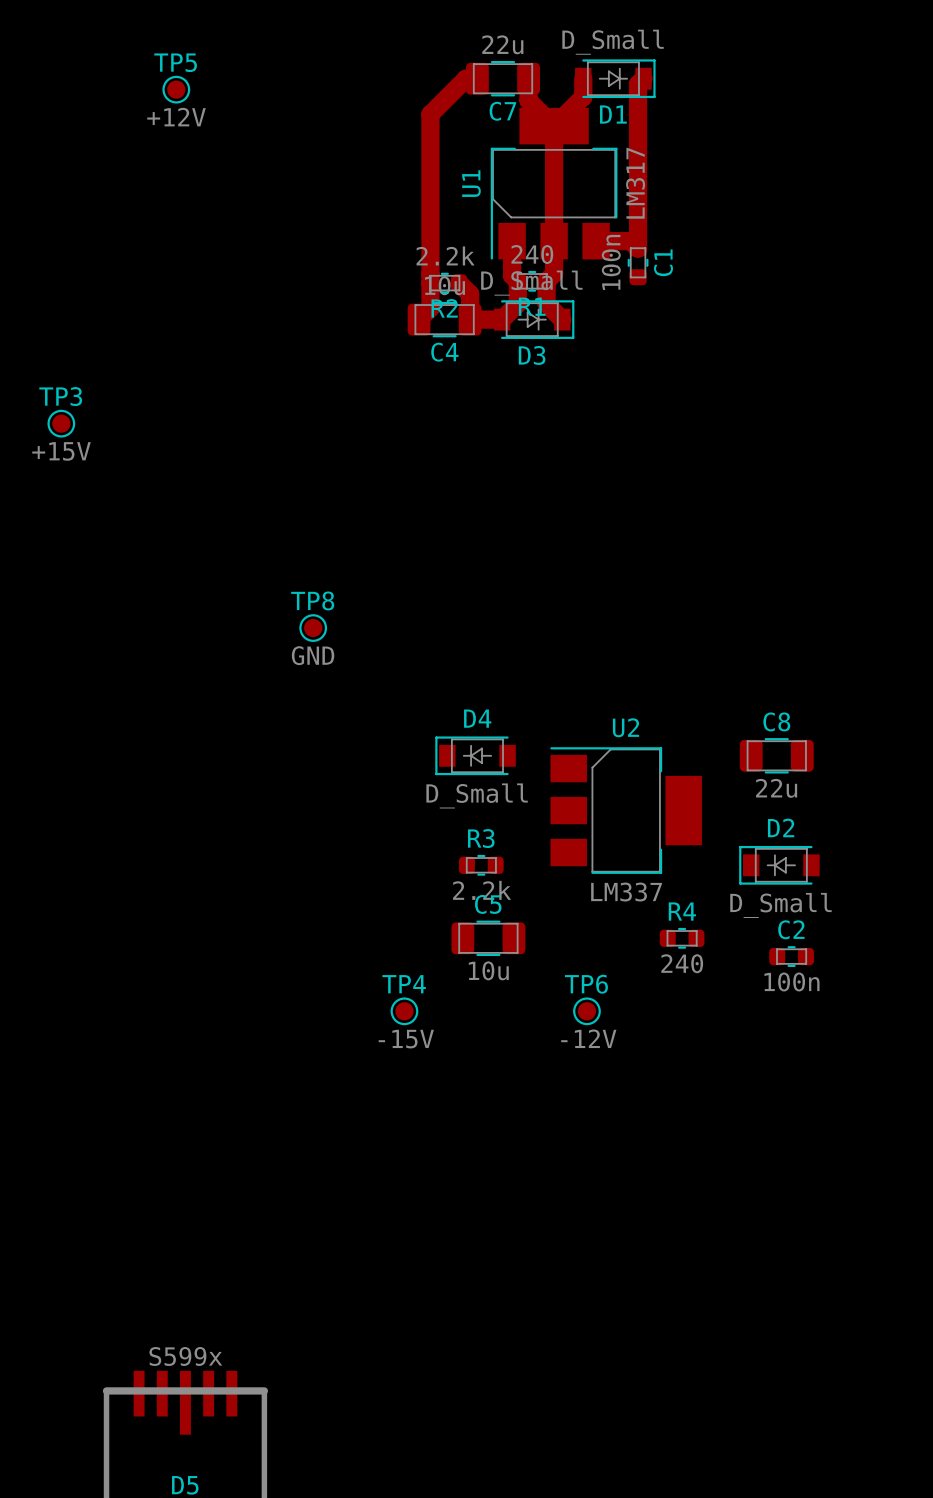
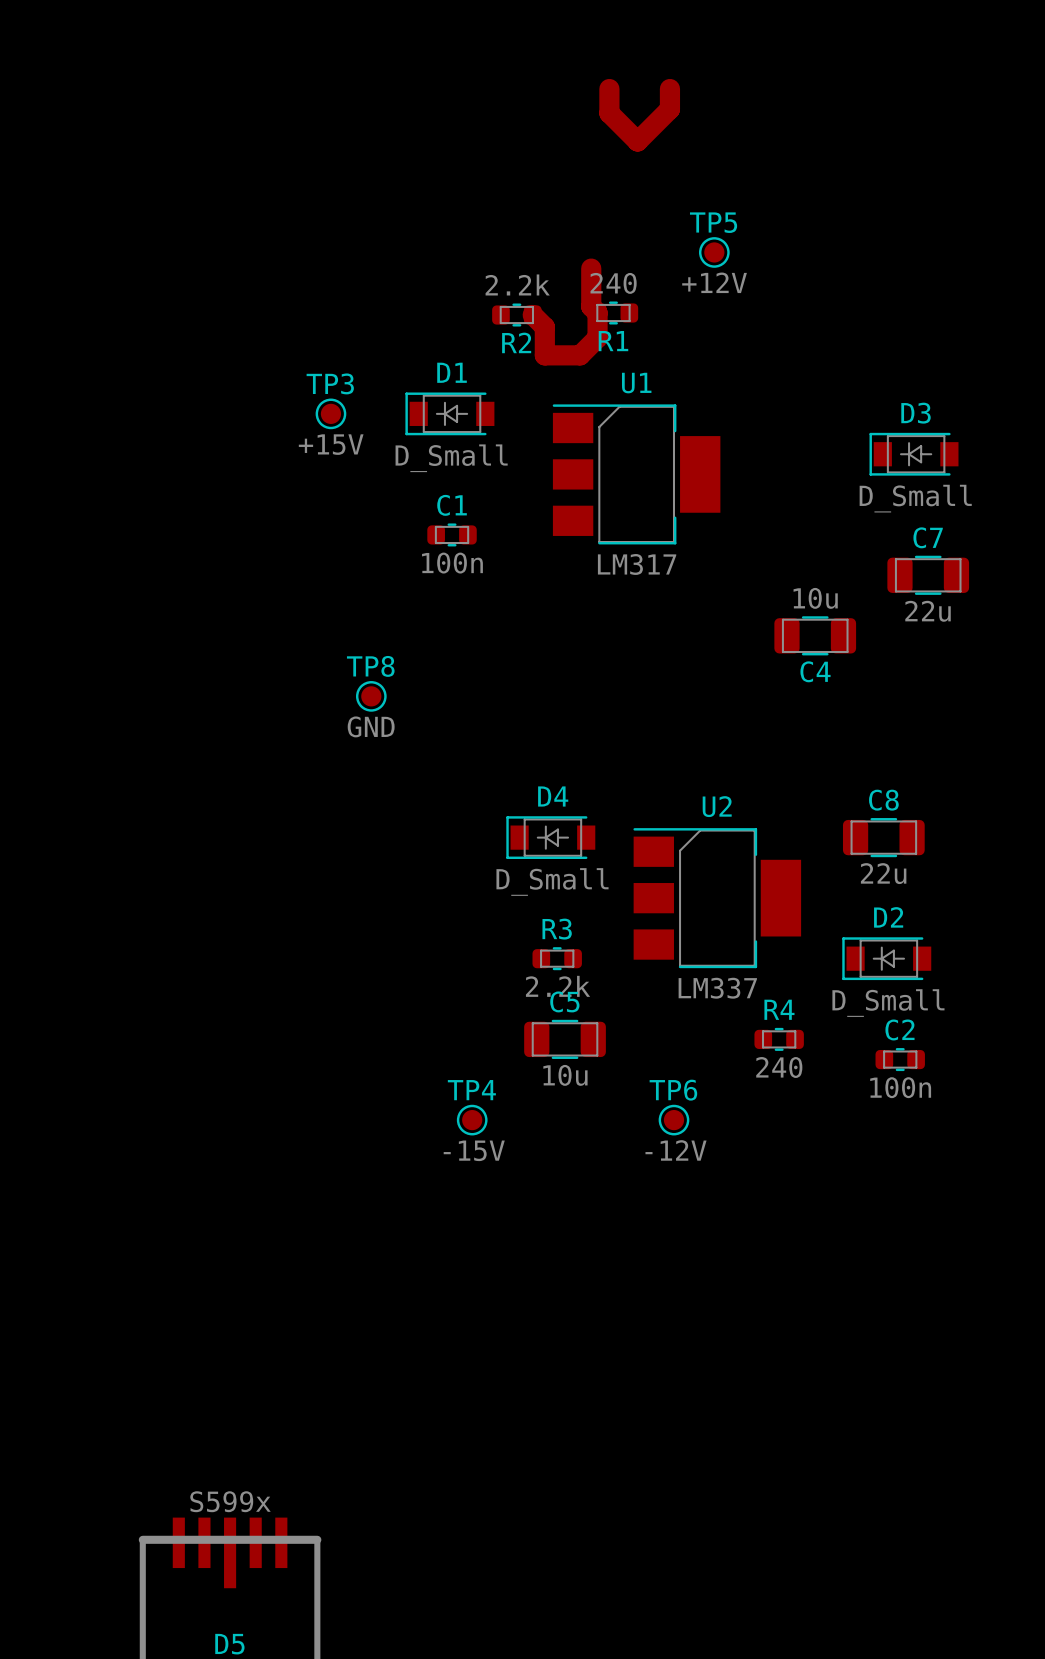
C7 value position: 22u (502, 44) -> 22u (928, 611)
track: (477, 78) (466, 78) (430, 114) (430, 308) (419, 319) -> none
C7 position: (503, 78) -> (928, 575)
D1 rotation: 0° (615, 78) -> 180° (449, 413)
D1 position: (615, 78) -> (449, 413)
track: (643, 78) (638, 84) (638, 248) (630, 241) (596, 241) -> none
TP5 position: (176, 89) -> (714, 252)
C7 name position: C7 (502, 111) -> C7 (928, 537)
track: (554, 126) (554, 273) (546, 281) (546, 303) (562, 319) -> none
U1 rotation: 0° (554, 183) -> 90° clockwise (636, 474)
U1 position: (554, 183) -> (636, 474)
C1 value position: 100n (611, 262) -> 100n (452, 563)
C1 rotation: 0° (638, 262) -> 90° clockwise (452, 534)
C1 position: (638, 262) -> (452, 534)
C1 name position: C1 (663, 262) -> C1 (452, 505)
C4 position: (444, 319) -> (815, 635)
D3 rotation: 0° (534, 319) -> 180° (914, 454)
D3 position: (534, 319) -> (914, 454)
TP3 position: (61, 423) -> (330, 413)

